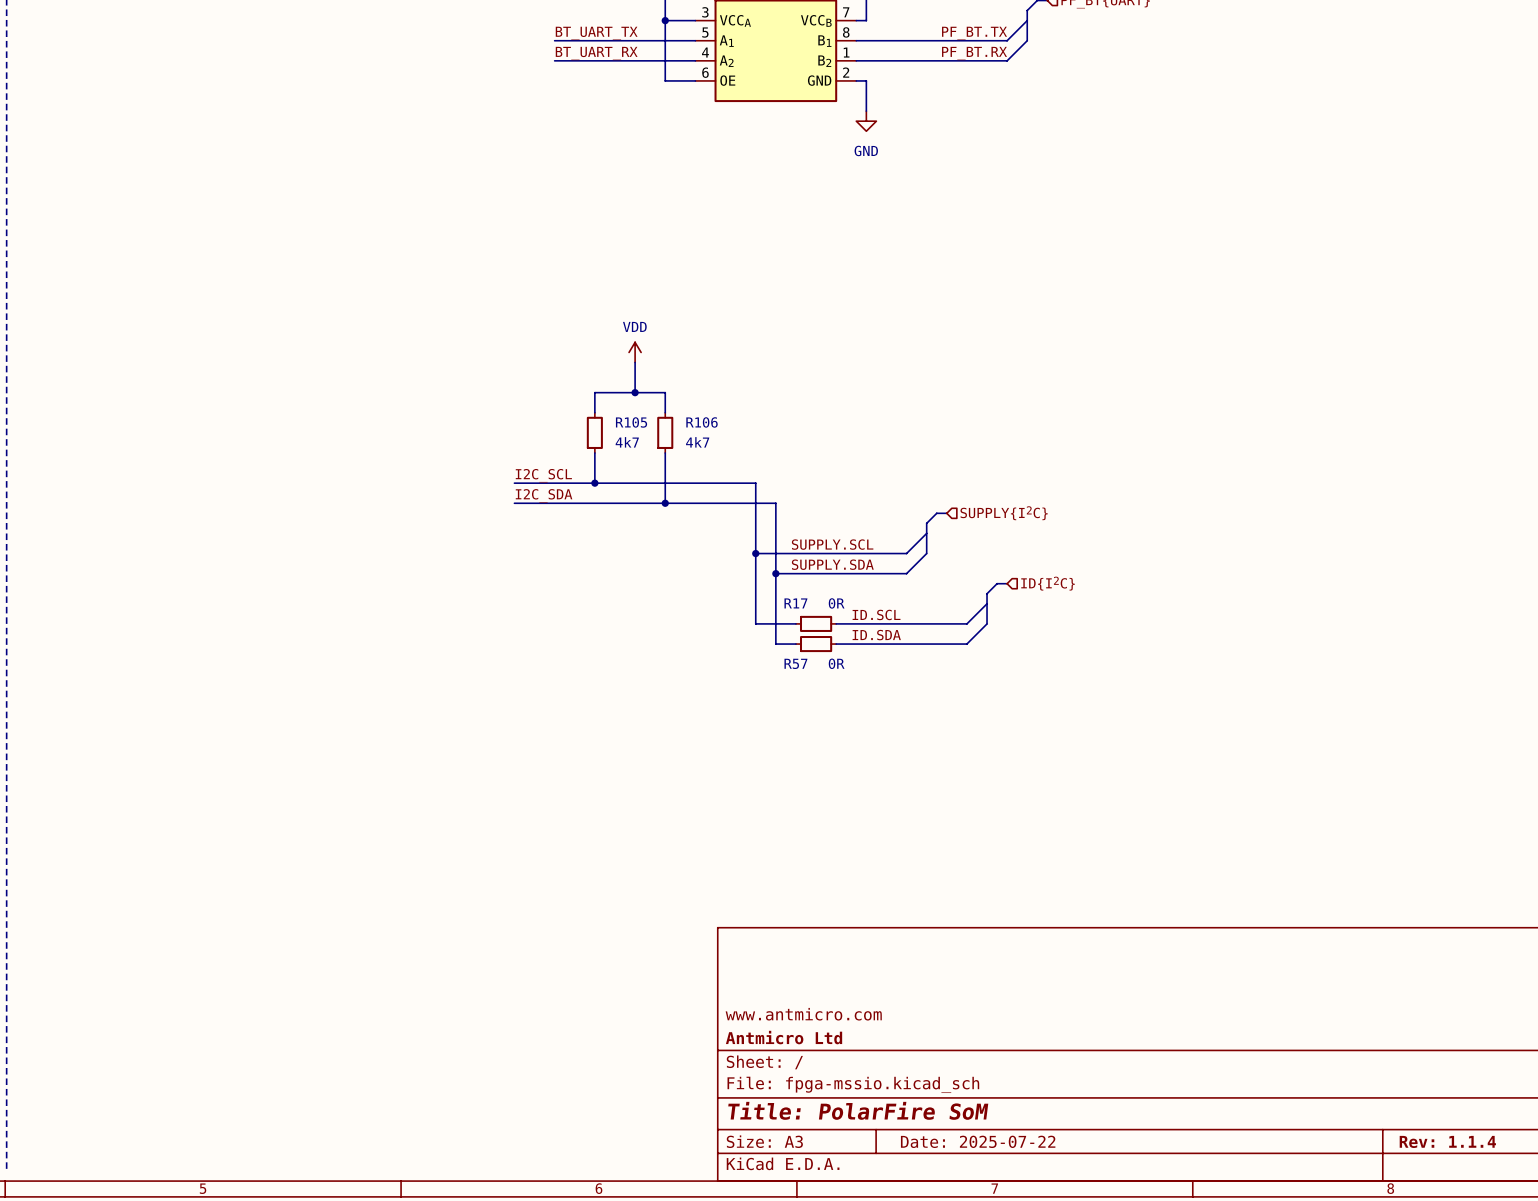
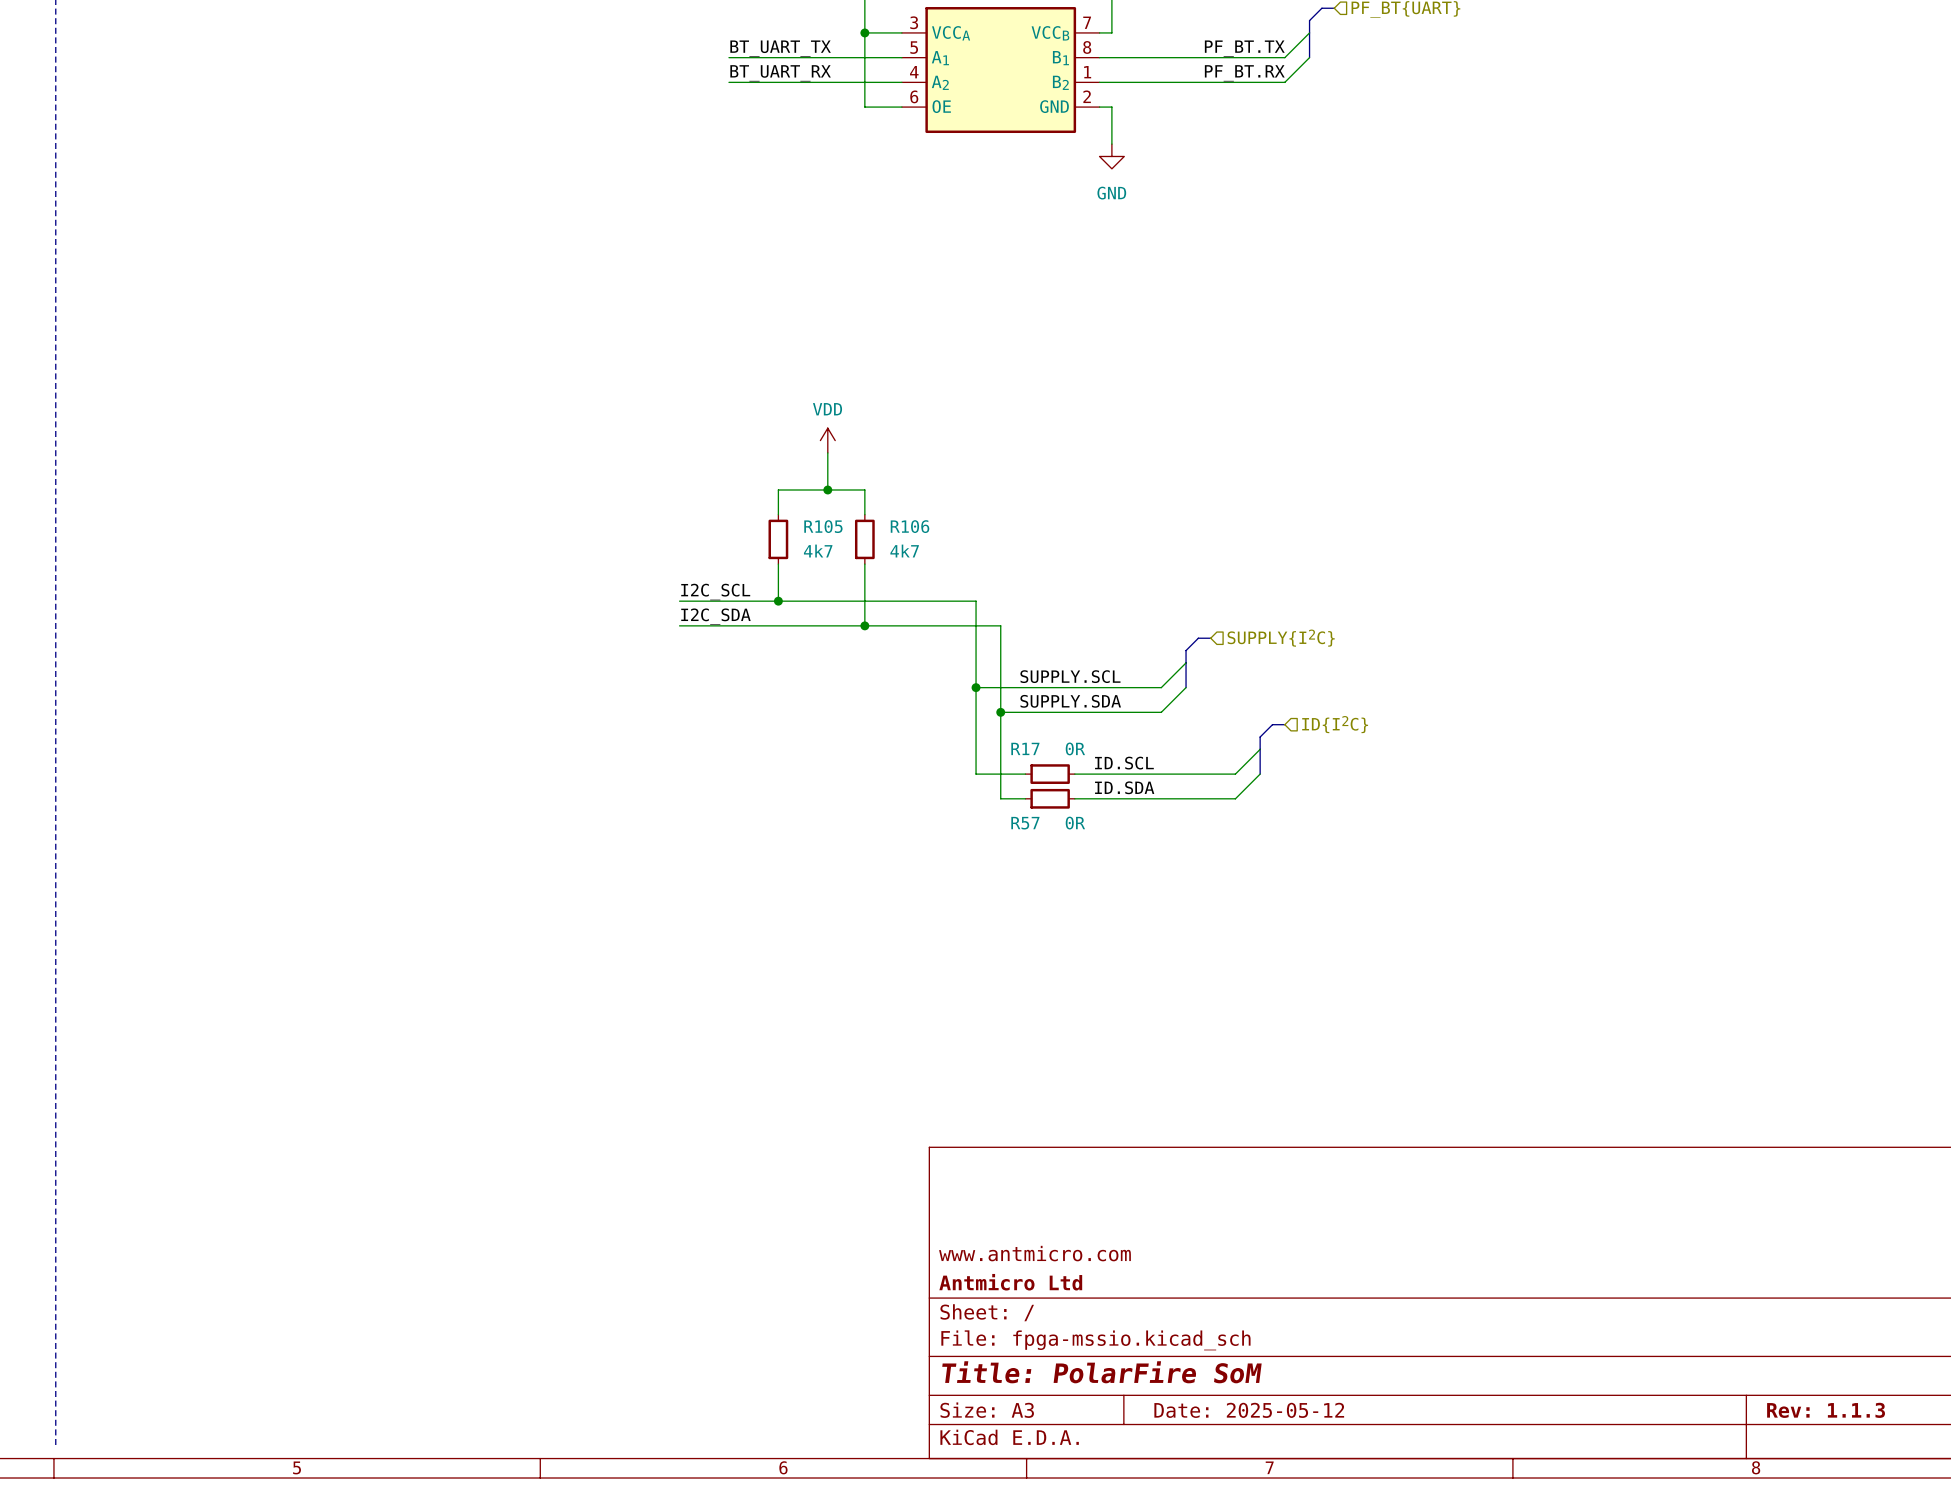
title block: Date: 2025-07-22 (978, 1141) -> Date: 2025-05-12 (1249, 1410)
title block: Rev: 1.1.4 (1447, 1141) -> Rev: 1.1.3 (1826, 1410)

